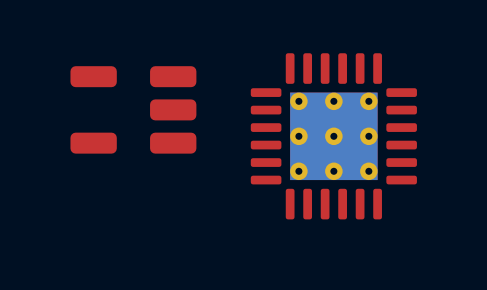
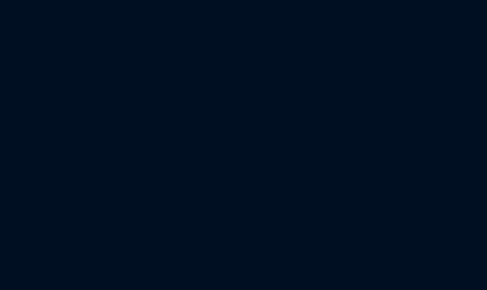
part: (133, 109) -> none
part: (333, 136) -> none

